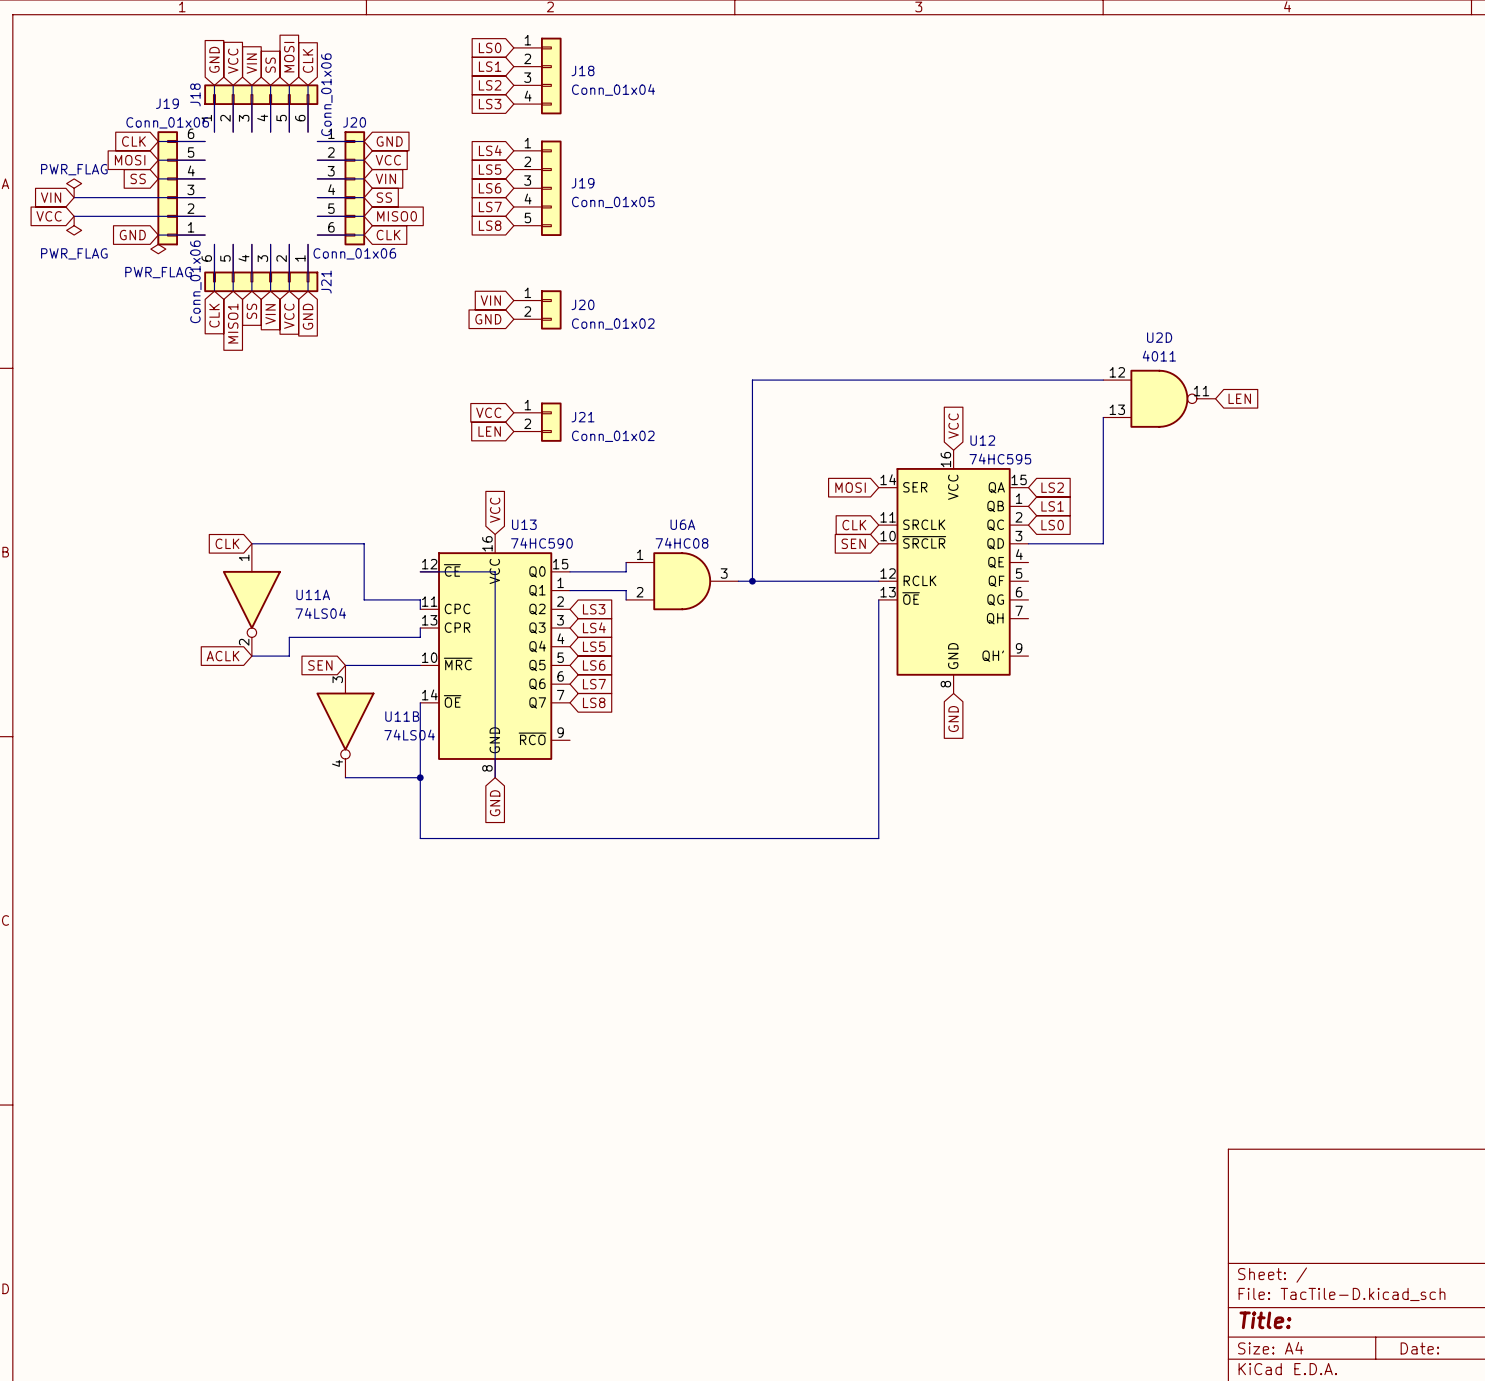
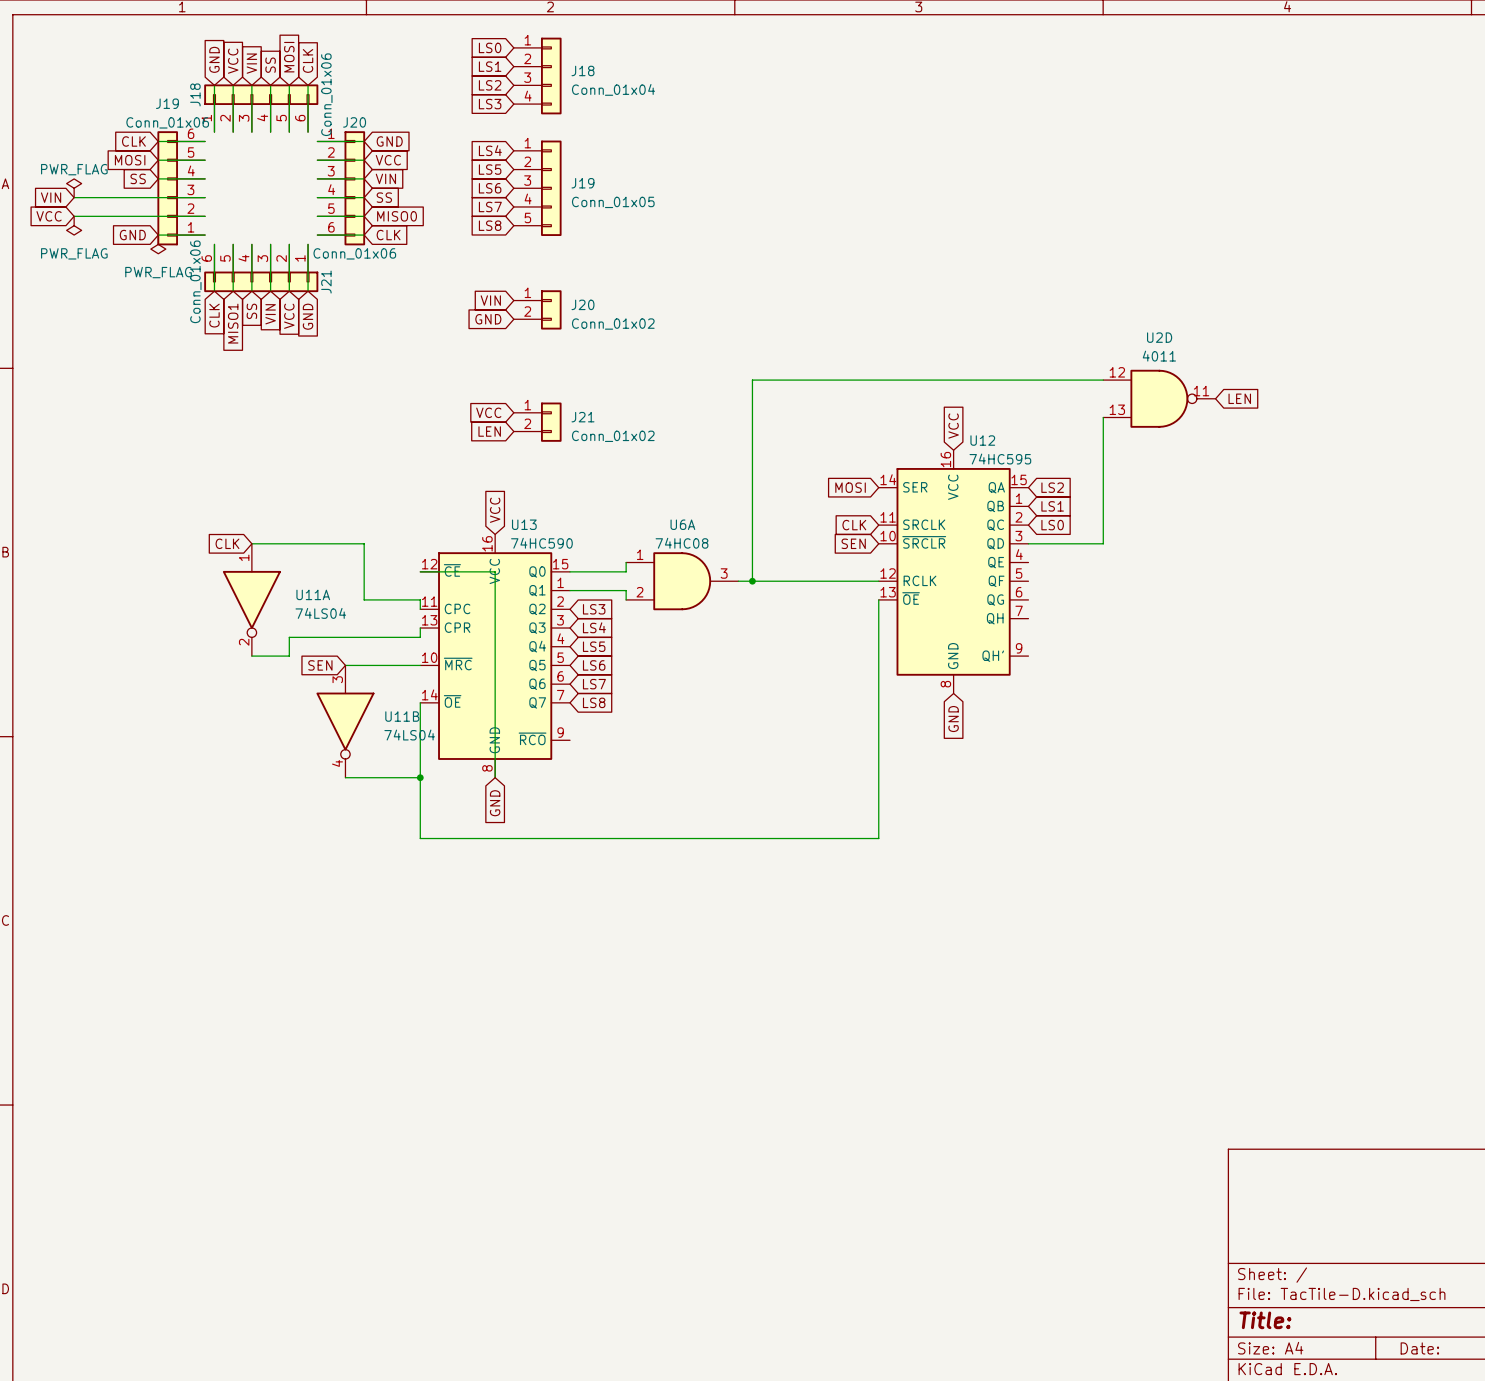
global label: ACLK (223, 656) -> none

